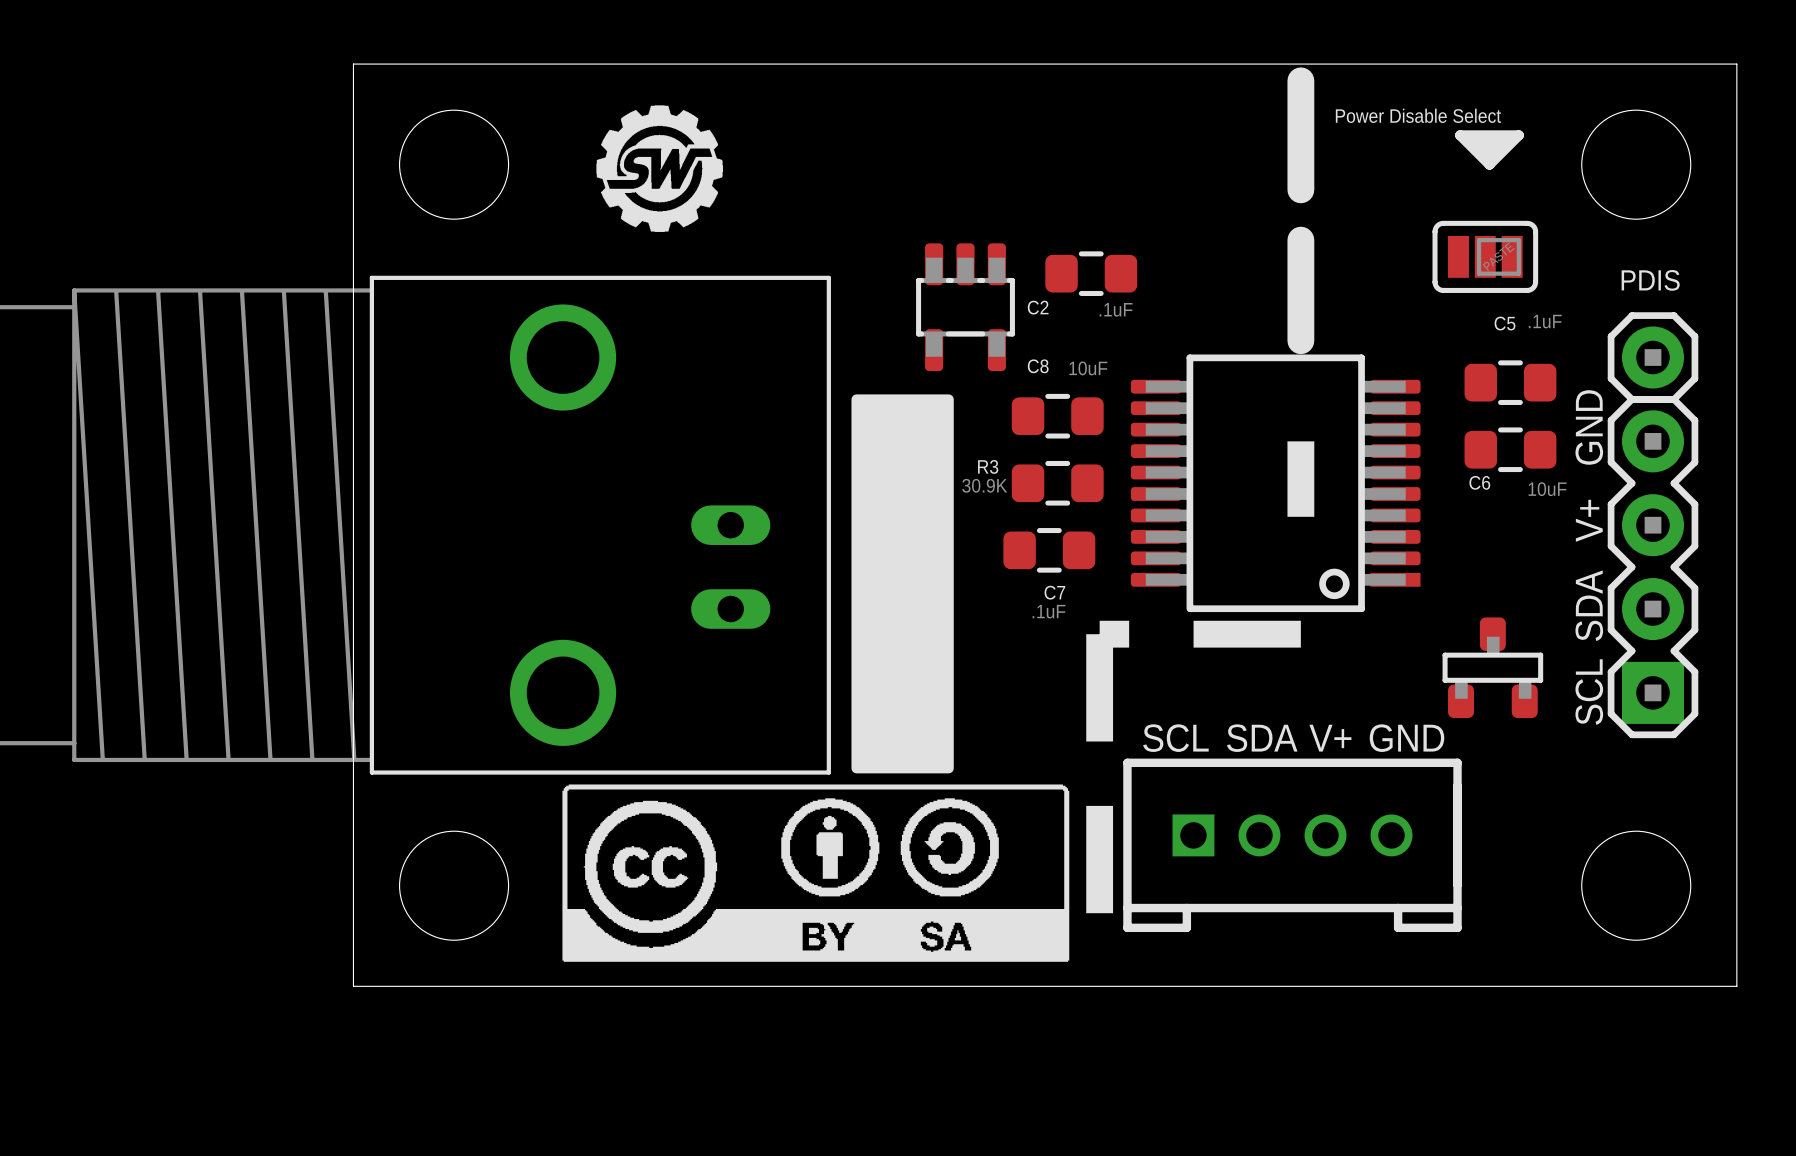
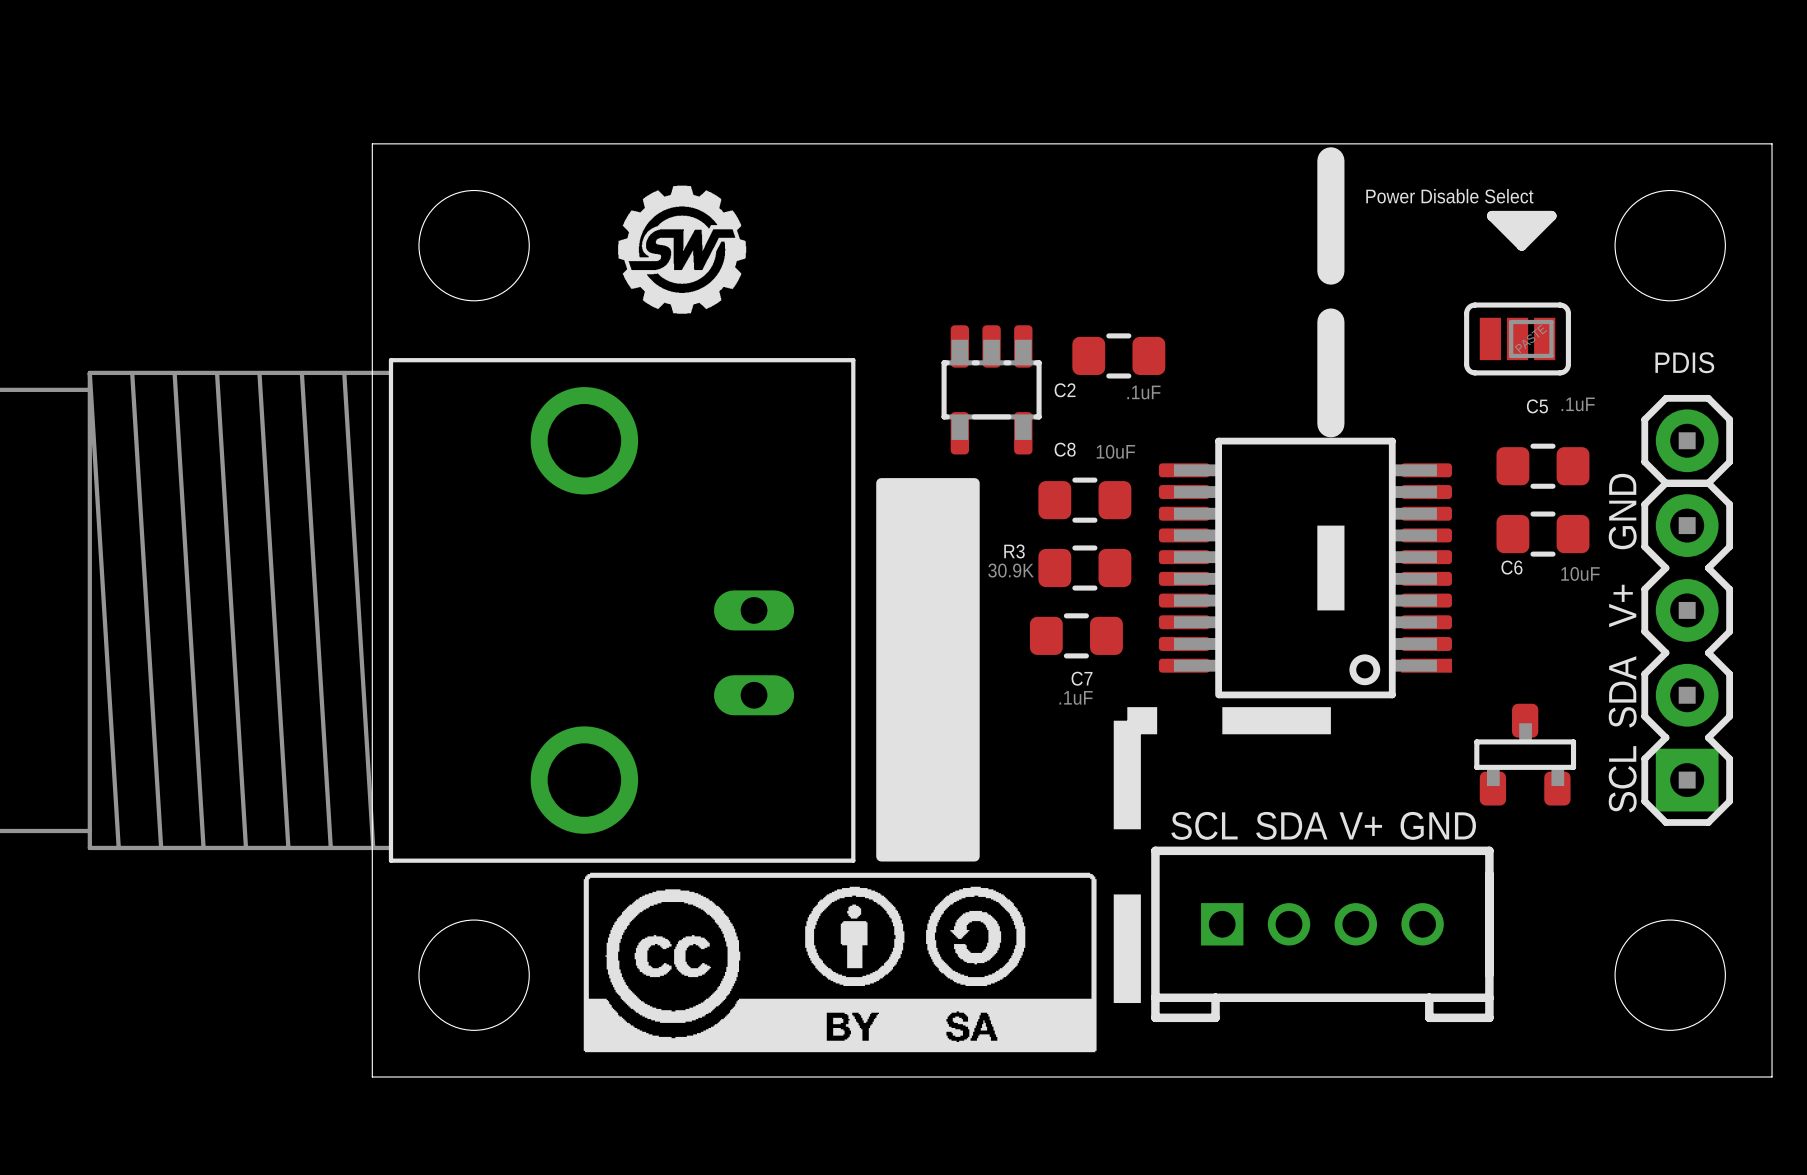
line: none -> (1330, 601) (1330, 610)

